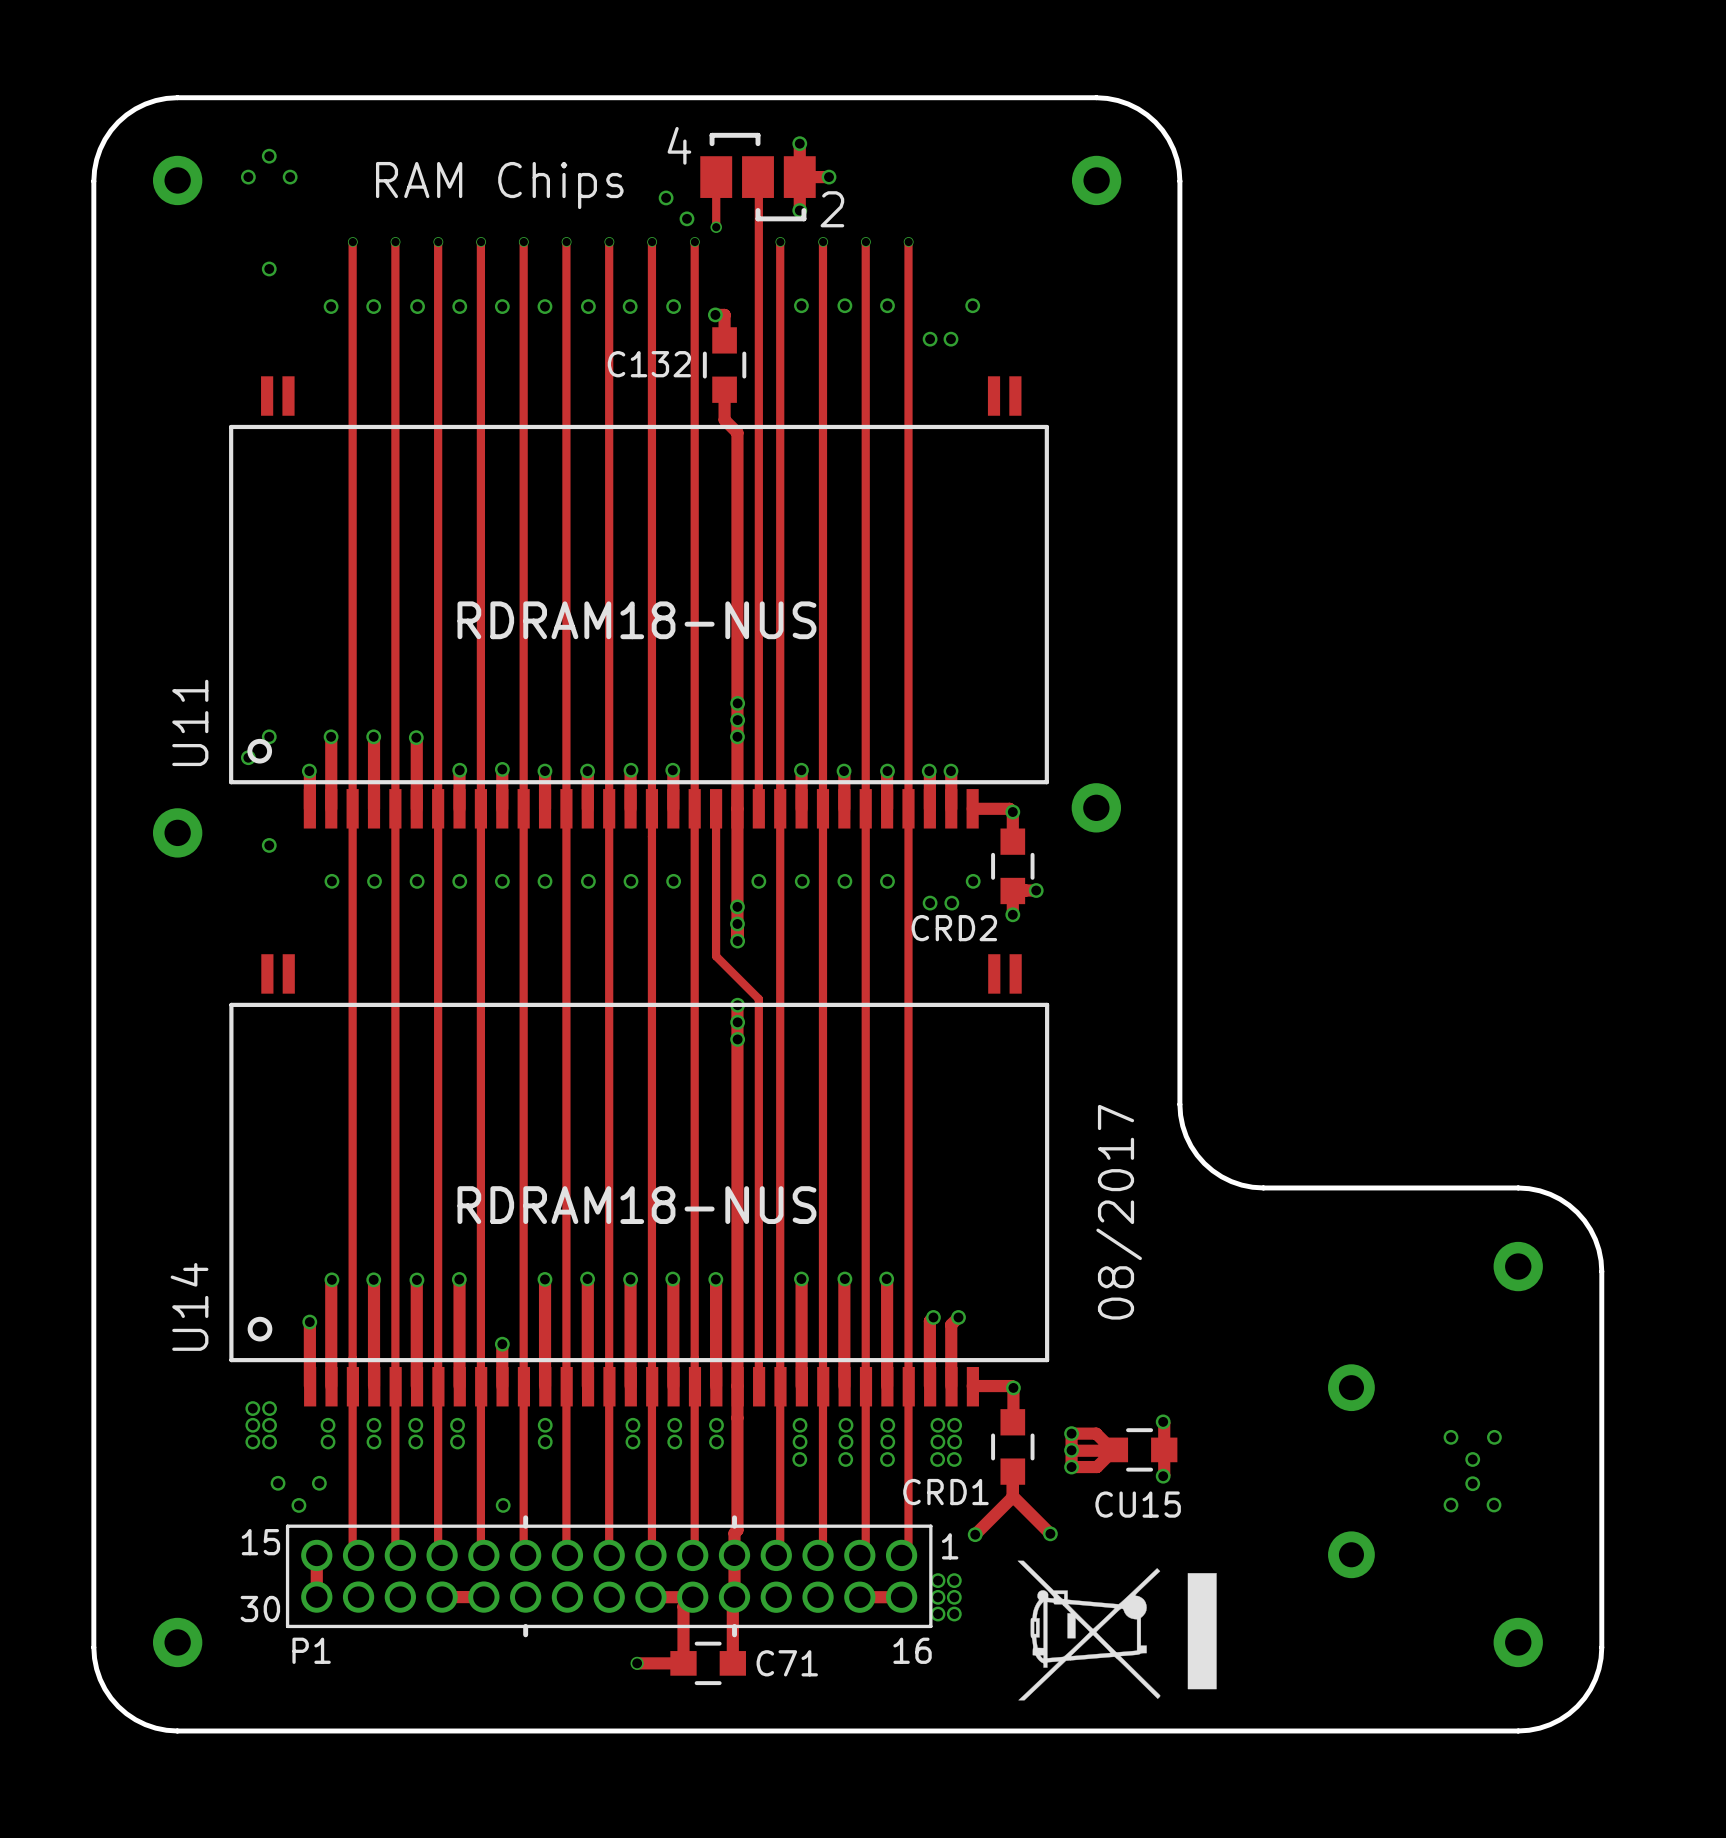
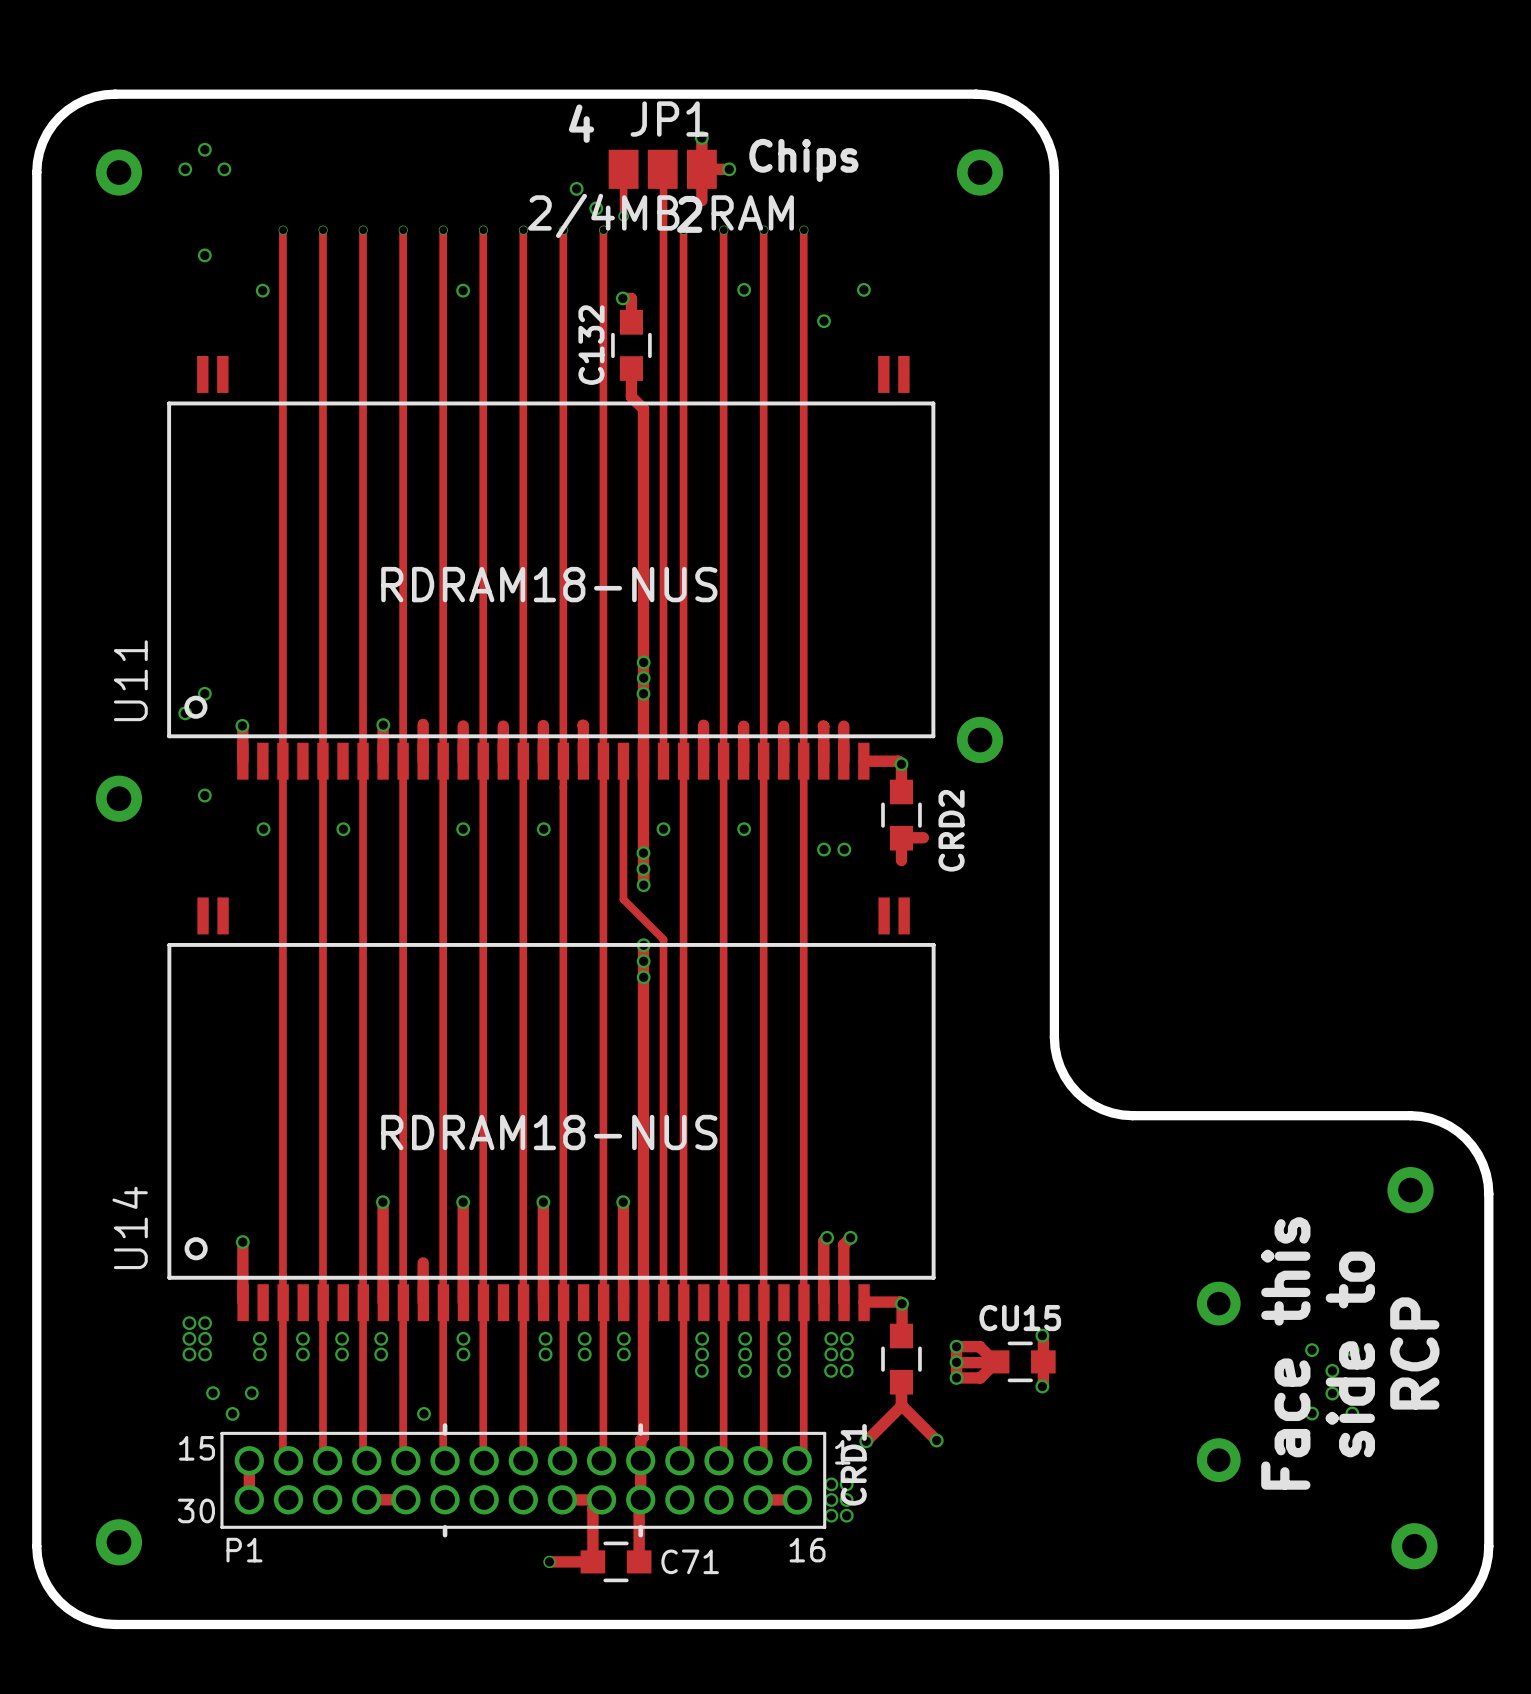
board edge: (177, 97) (1096, 97) (1117, 100) (1138, 108) (1162, 130) (1173, 149) (1179, 181) (1179, 1104) (1182, 1126) (1191, 1146) (1204, 1163) (1221, 1176) (1241, 1185) (1263, 1187) (1529, 1188) (1550, 1194) (1569, 1205) (1590, 1229) (1598, 1249) (1601, 1271) (1601, 1647) (1598, 1669) (1590, 1689) (1569, 1713) (1550, 1724) (1518, 1731) (177, 1731) (145, 1724) (126, 1713) (111, 1698) (96, 1669) (93, 1647) (93, 181) (100, 149) (118, 122) (145, 104) (177, 97) -> (115, 94) (85, 100) (59, 117) (42, 142) (36, 172) (36, 1546) (42, 1576) (59, 1601) (85, 1618) (115, 1624) (1410, 1624) (1440, 1618) (1465, 1601) (1482, 1576) (1488, 1546) (1488, 1193) (1486, 1173) (1472, 1146) (1449, 1126) (1420, 1116) (1132, 1115) (1112, 1113) (1093, 1105) (1077, 1092) (1064, 1076) (1057, 1057) (1054, 1037) (1054, 172) (1048, 142) (1031, 117) (1006, 100) (976, 94) (115, 94)
JP1 name: none -> JP1 (669, 119)
line: (712, 143) (712, 135) (758, 135) (758, 143) -> none
text position: 4 (679, 145) -> 4 (581, 123)
text: none -> Chips (803, 160)
text: RAM Chips (499, 185) -> none
text position: 2 (832, 209) -> 2 (689, 214)
line: (758, 210) (758, 218) (803, 218) (803, 210) -> none
via: (799, 210) -> none
JP1 value: none -> 2/4MB RAM (661, 215)
via: (801, 305) -> none
via: (887, 305) -> none
via: (373, 306) -> none
via: (417, 306) -> none
via: (459, 306) -> none
via: (502, 306) -> none
via: (588, 306) -> none
via: (630, 306) -> none
via: (673, 306) -> none
via: (950, 339) -> none
C132 name rotation: 0° (649, 364) -> 90° counterclockwise (591, 345)
track: (331, 736) (331, 808) -> none
via: (331, 736) -> none
via: (373, 736) -> none
track: (374, 737) (374, 808) -> none
via: (416, 737) -> none
track: (416, 738) (416, 808) -> none
via: (502, 769) -> none
via: (631, 770) -> none
via: (672, 770) -> none
via: (801, 770) -> none
via: (544, 771) -> none
via: (587, 771) -> none
via: (844, 771) -> none
via: (887, 771) -> none
via: (929, 771) -> none
via: (950, 771) -> none
part position: (1096, 807) -> (980, 740)
part position: (177, 832) -> (118, 798)
via: (374, 881) -> none
via: (459, 881) -> none
via: (502, 881) -> none
via: (588, 881) -> none
via: (673, 881) -> none
via: (802, 881) -> none
via: (887, 881) -> none
via: (973, 881) -> none
via: (1036, 890) -> none
via: (1012, 914) -> none
CRD2 name rotation: 0° (954, 928) -> 90° counterclockwise (951, 830)
CRD2 name position: CRD2 (954, 928) -> CRD2 (951, 830)
text: 08/2017 (1119, 1212) -> none
part position: (1518, 1266) -> (1410, 1190)
track: (331, 1279) (331, 1386) -> none
via: (331, 1279) -> none
via: (373, 1279) -> none
track: (587, 1279) (587, 1386) -> none
via: (587, 1279) -> none
track: (672, 1279) (673, 1386) -> none
via: (672, 1279) -> none
track: (801, 1279) (801, 1386) -> none
via: (801, 1279) -> none
track: (844, 1279) (844, 1386) -> none
via: (844, 1279) -> none
via: (886, 1279) -> none
track: (887, 1279) (887, 1386) -> none
track: (374, 1280) (374, 1386) -> none
track: (416, 1280) (416, 1386) -> none
via: (416, 1280) -> none
via: (502, 1344) -> none
text: none -> Face this (1285, 1353)
text: none -> RCP (1414, 1353)
text: none -> side to (1350, 1354)
CRD1 name rotation: 0° (945, 1492) -> 90° counterclockwise (853, 1464)
CU15 name position: CU15 (1138, 1504) -> CU15 (1020, 1318)
drawing: [1017, 1560, 1217, 1701] -> none
part position: (1518, 1642) -> (1414, 1546)

